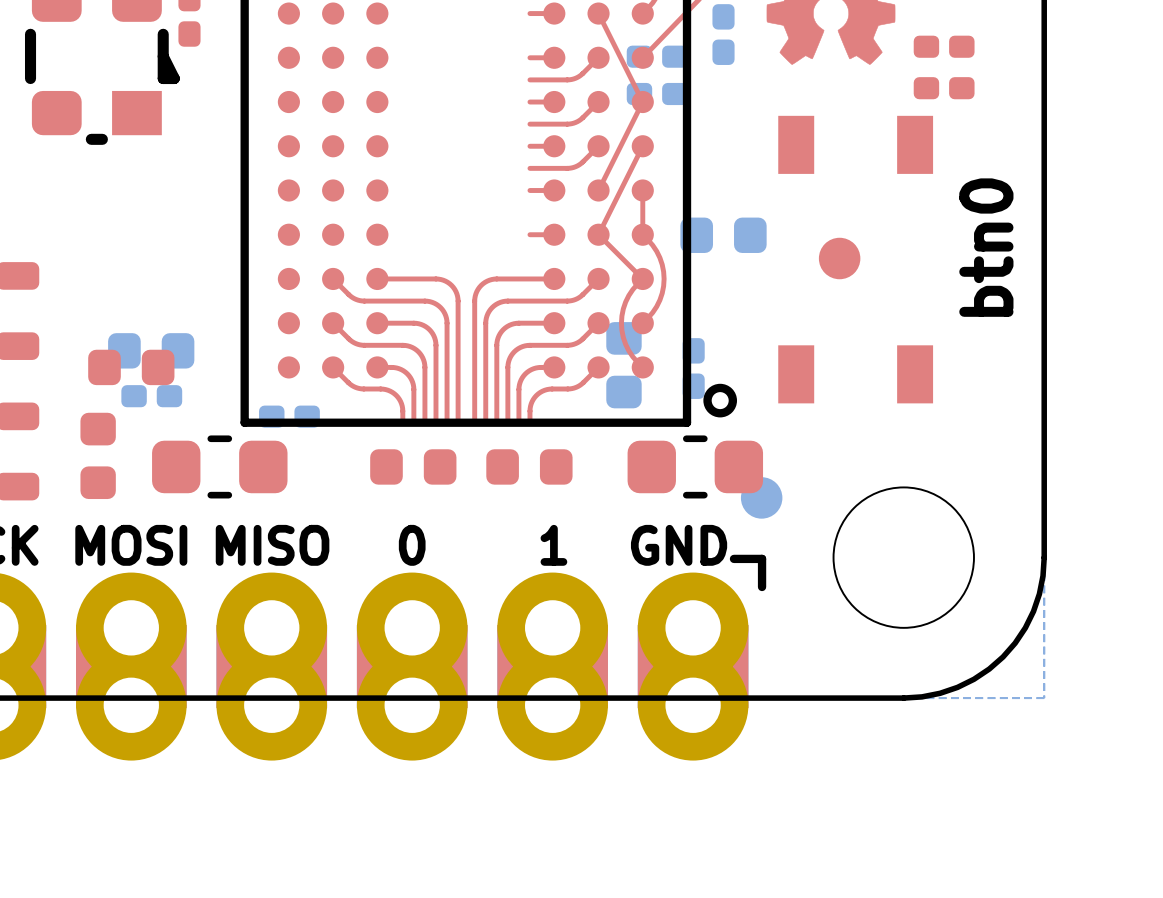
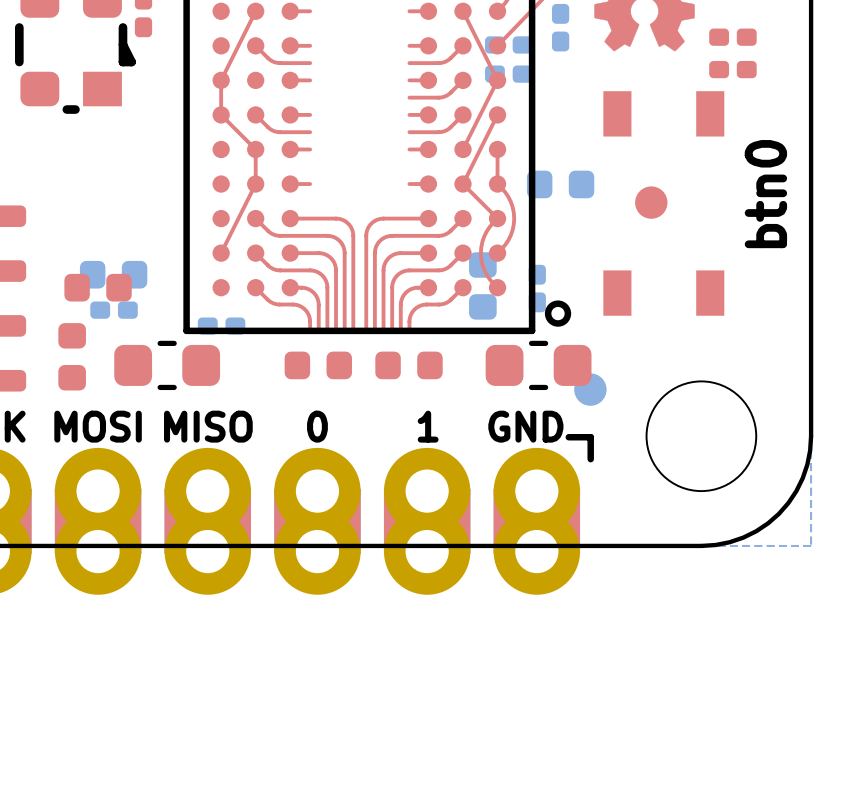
top track: none -> (255, 11) (221, 80) (221, 114) (255, 149) (255, 184) (221, 253)
top track: none -> (290, 11) (310, 11)
top track: none -> (255, 45) (275, 62) (310, 63)
top track: none -> (290, 45) (310, 45)
top track: none -> (290, 80) (310, 80)
top track: none -> (255, 114) (275, 131) (310, 132)
top track: none -> (290, 114) (310, 114)
top track: none -> (290, 149) (310, 149)
top track: none -> (290, 184) (310, 184)

